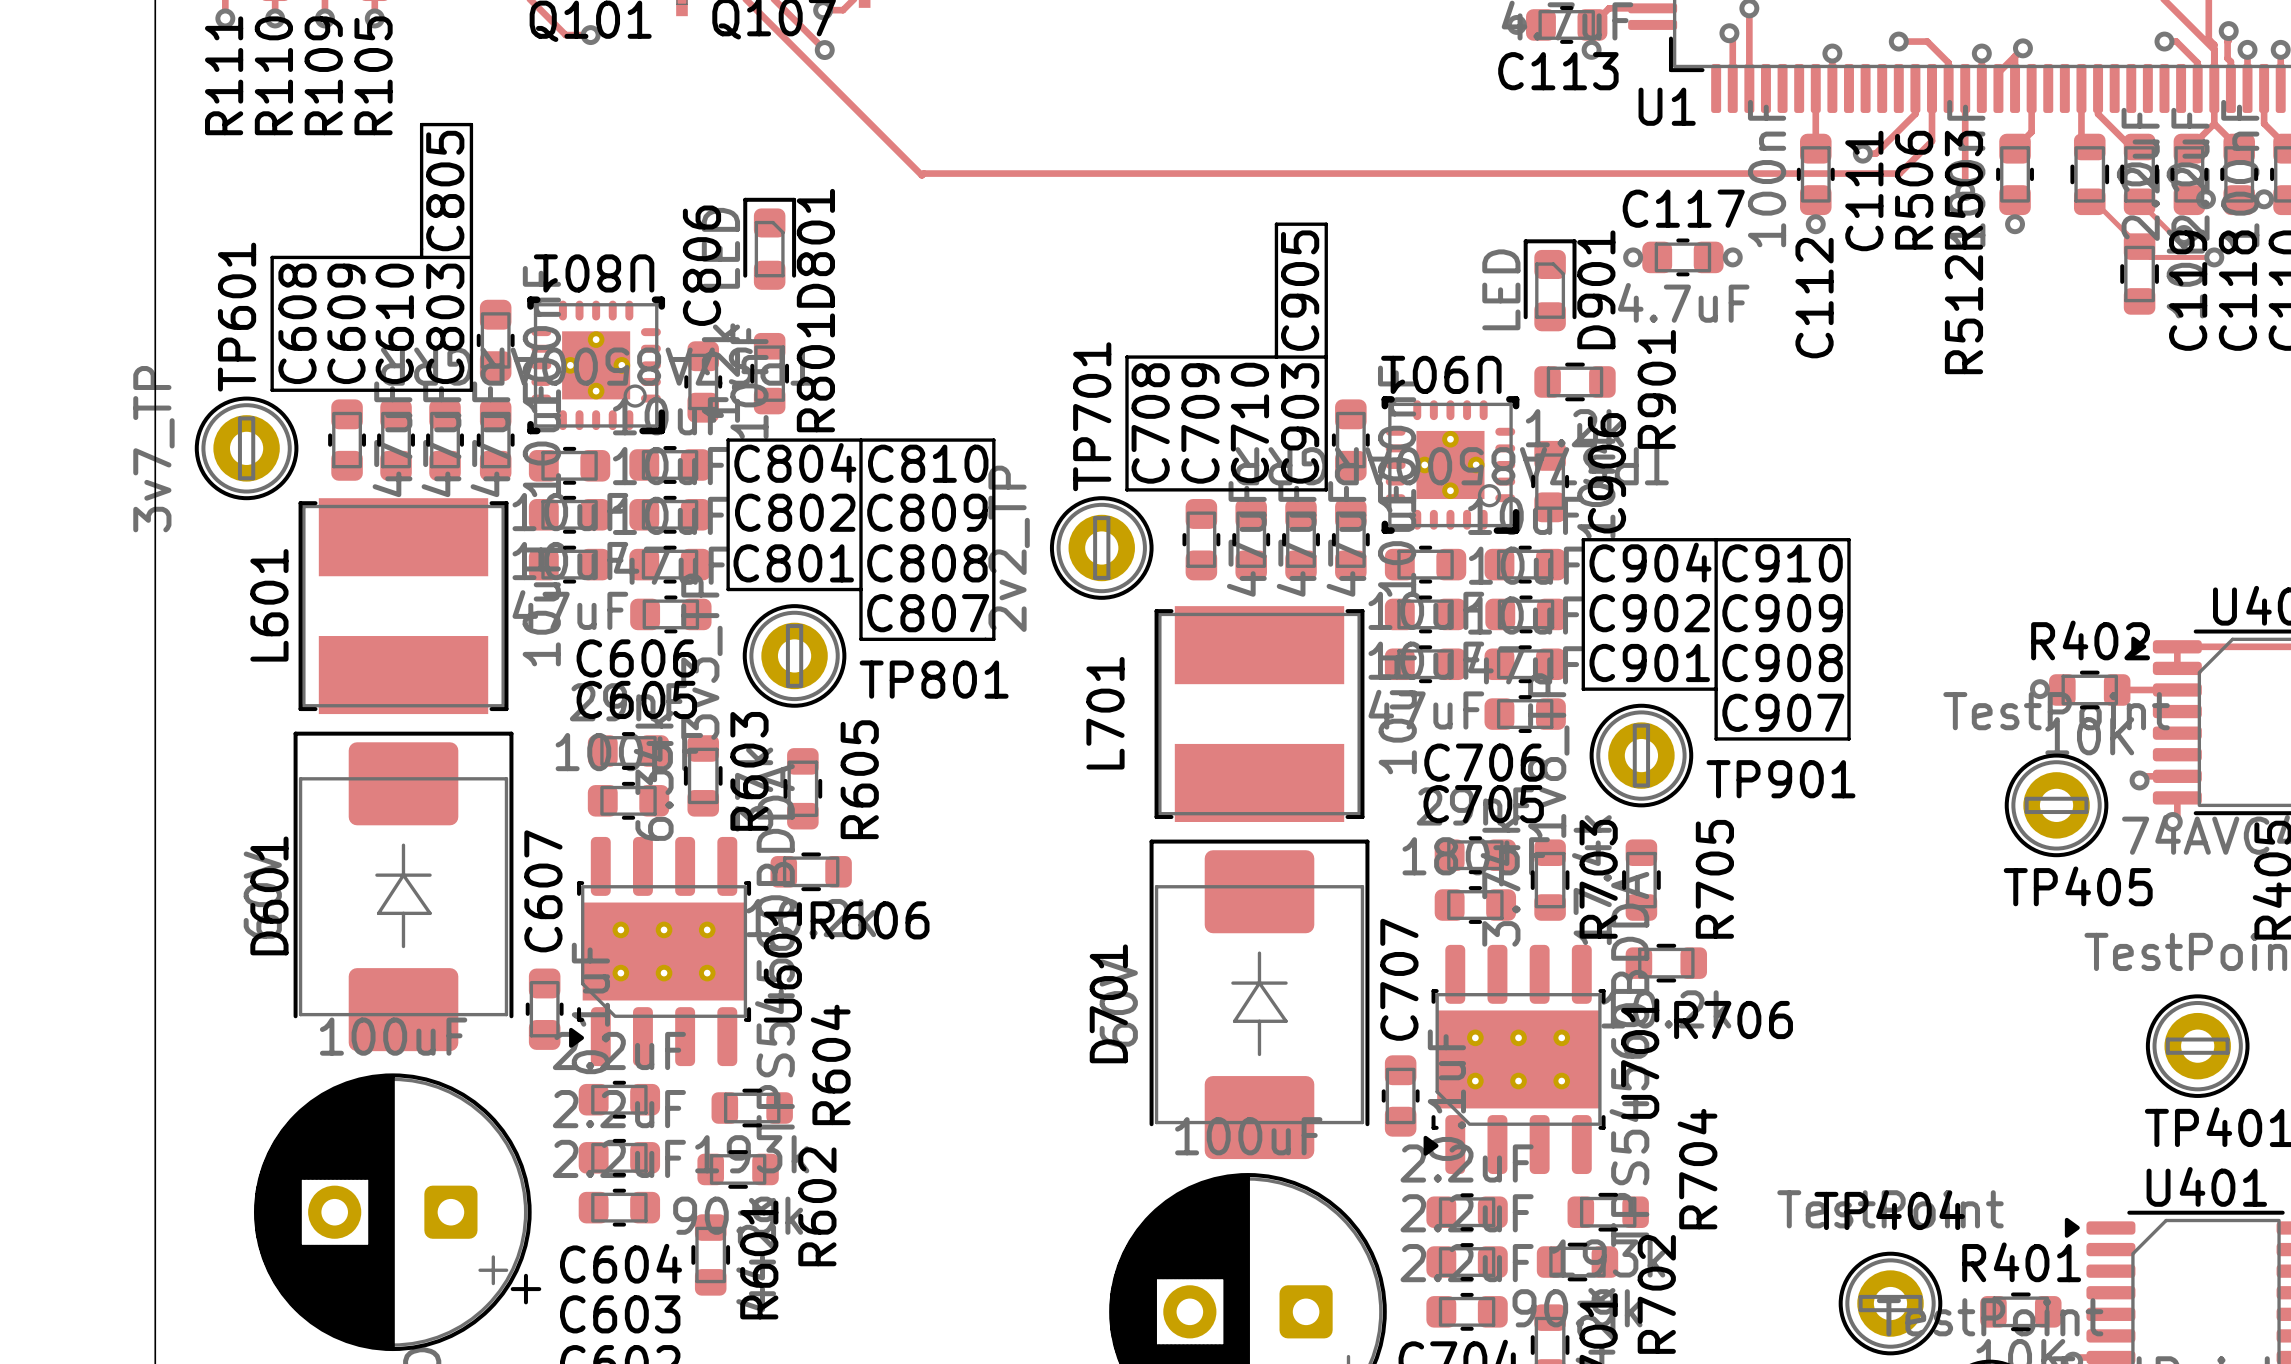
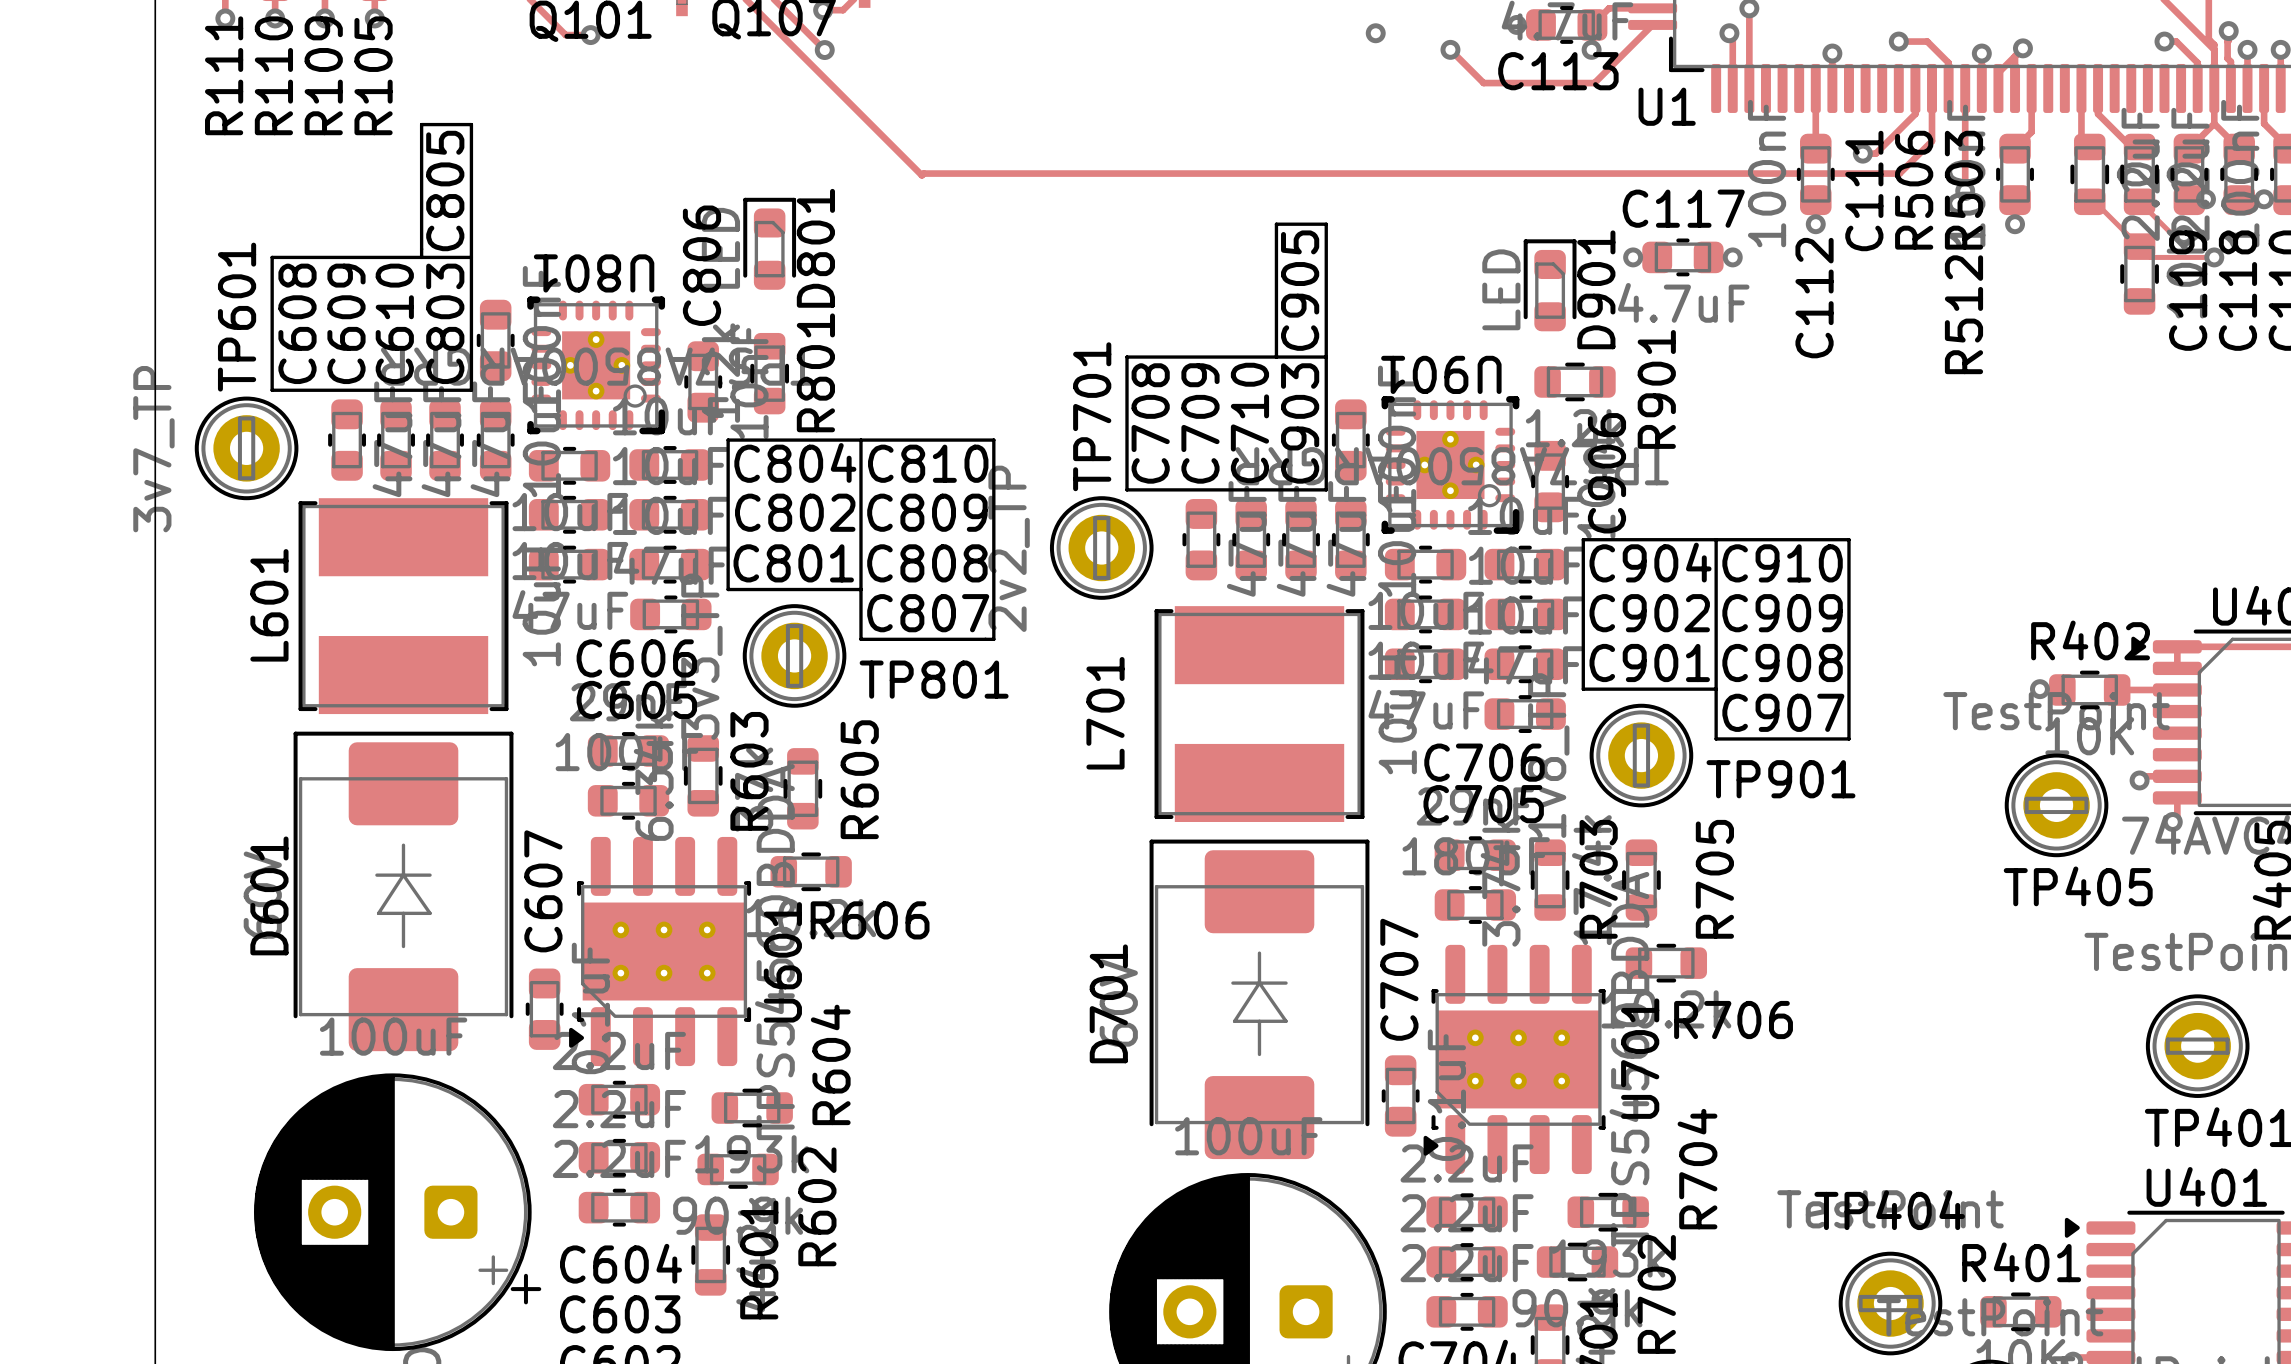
track: none -> (1652, 24) (1594, 83) (1483, 83) (1450, 49)
via: none -> (1375, 33)
via: none -> (1450, 49)

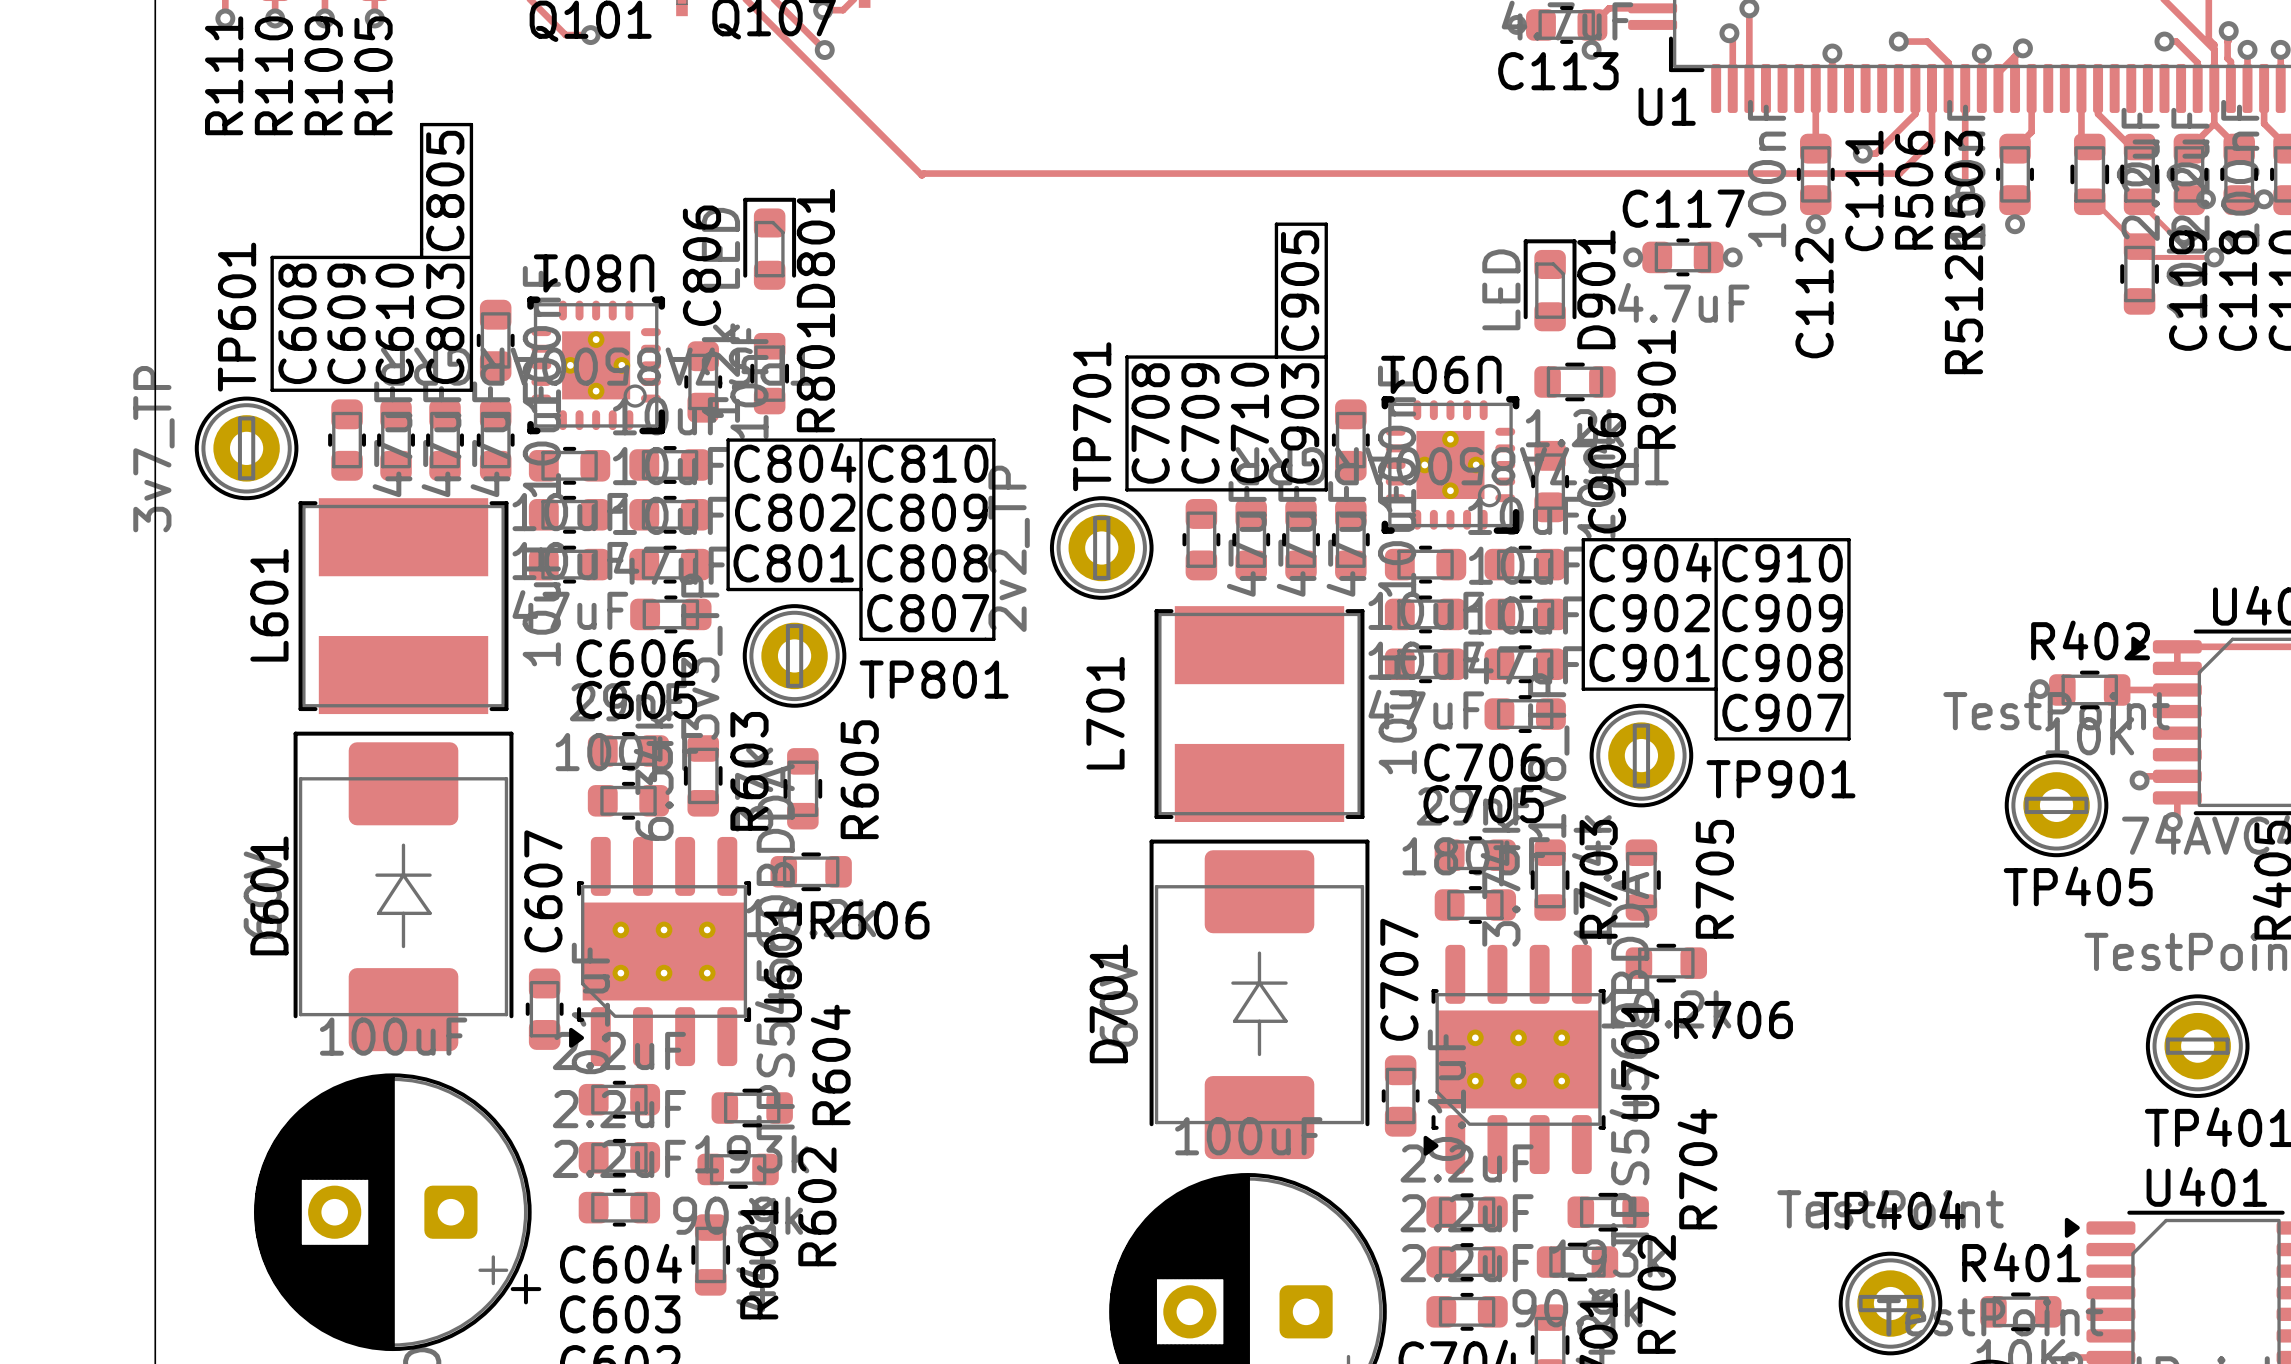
track: (1652, 24) (1594, 83) (1483, 83) (1450, 49) -> none
via: (1375, 33) -> none
via: (1450, 49) -> none

